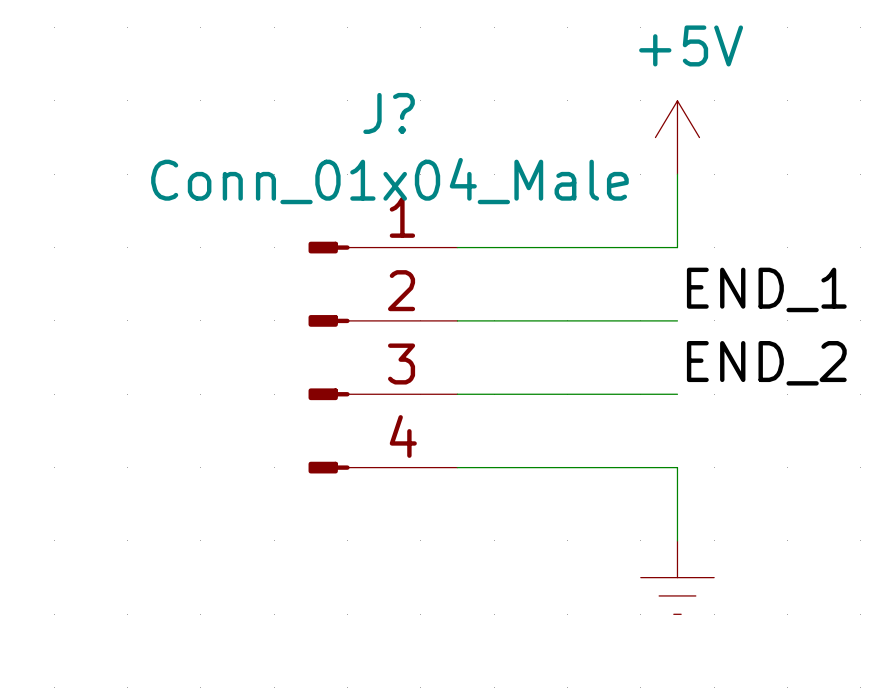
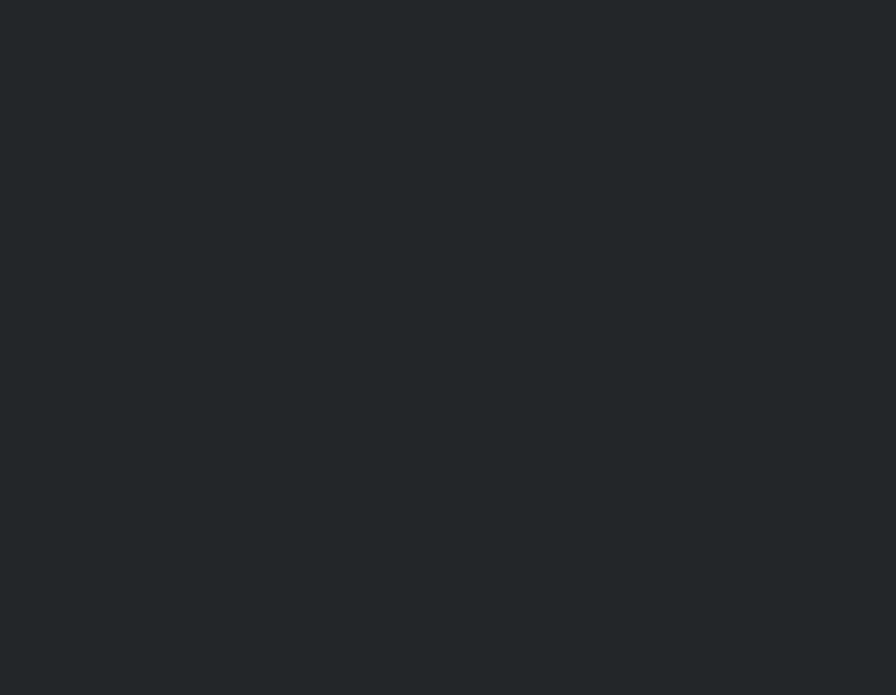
power symbol: +5V (677, 137) -> none
wire: (677, 174) (677, 247) (457, 247) -> none
label: END_1 (766, 289) -> none
wire: (457, 320) (677, 320) -> none
J?: Conn_01x04_Male (382, 357) -> none
label: END_2 (766, 363) -> none
wire: (457, 394) (677, 394) -> none
wire: (457, 467) (677, 467) (677, 540) -> none
power symbol: (677, 577) -> none

